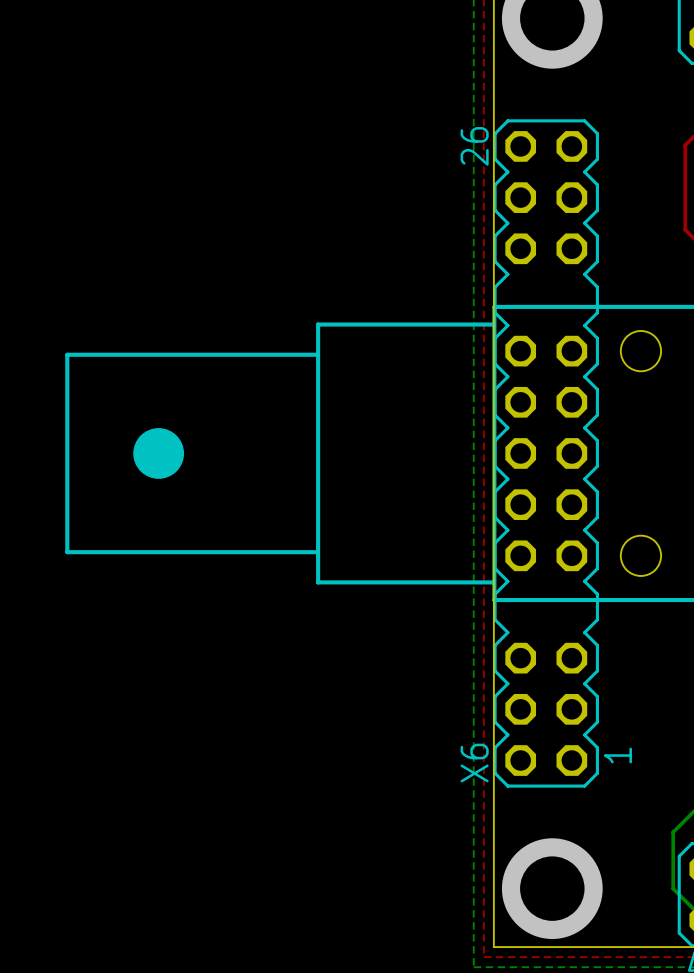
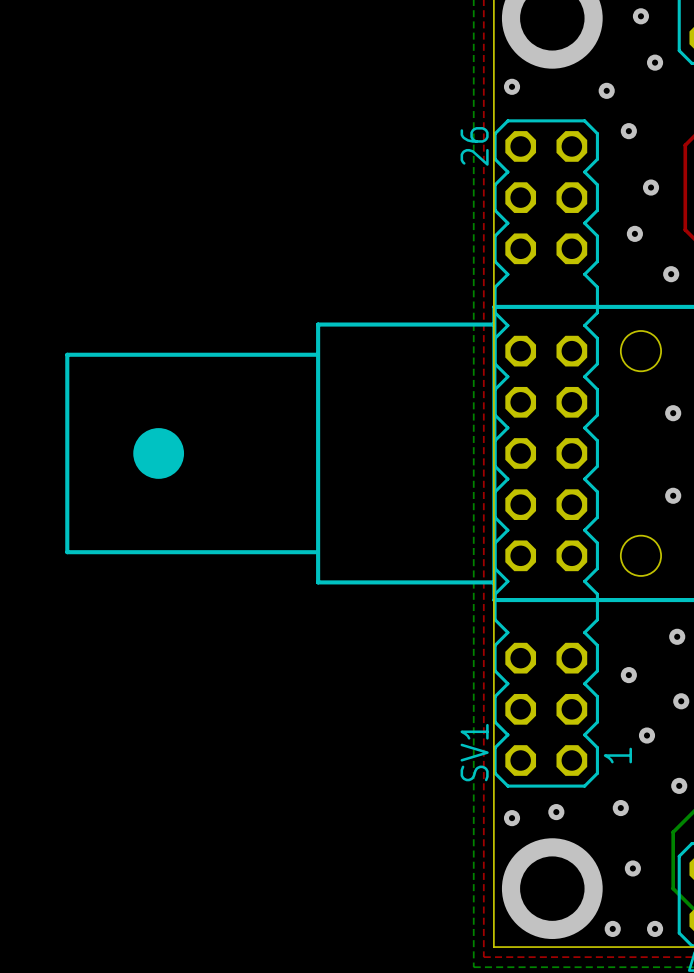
via: none -> (640, 16)
via: none -> (655, 62)
via: none -> (512, 86)
via: none -> (606, 90)
via: none -> (628, 131)
via: none -> (651, 187)
via: none -> (634, 233)
via: none -> (671, 274)
via: none -> (673, 413)
via: none -> (673, 495)
via: none -> (677, 636)
via: none -> (628, 675)
via: none -> (681, 701)
via: none -> (646, 735)
X6 name: X6 (474, 763) -> SV1 (474, 752)
via: none -> (679, 785)
via: none -> (620, 808)
via: none -> (556, 812)
via: none -> (512, 818)
via: none -> (632, 868)
via: none -> (612, 928)
via: none -> (655, 928)

